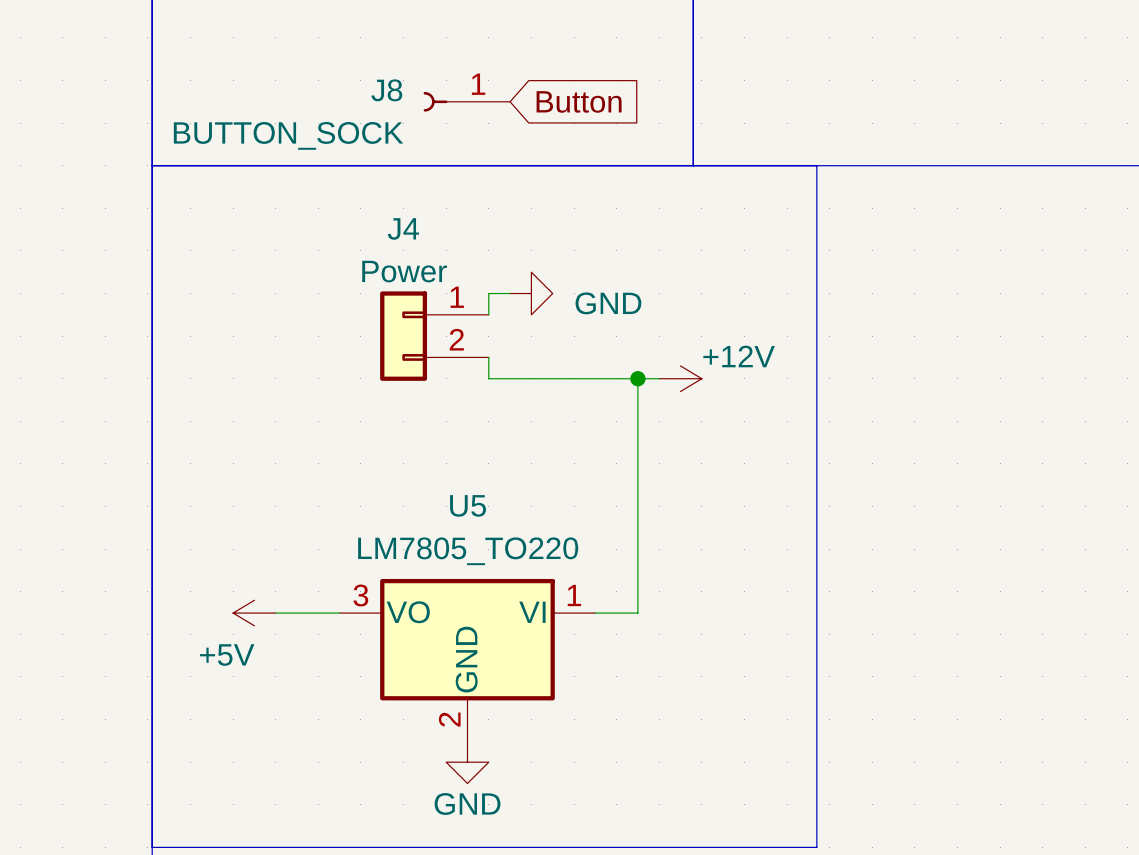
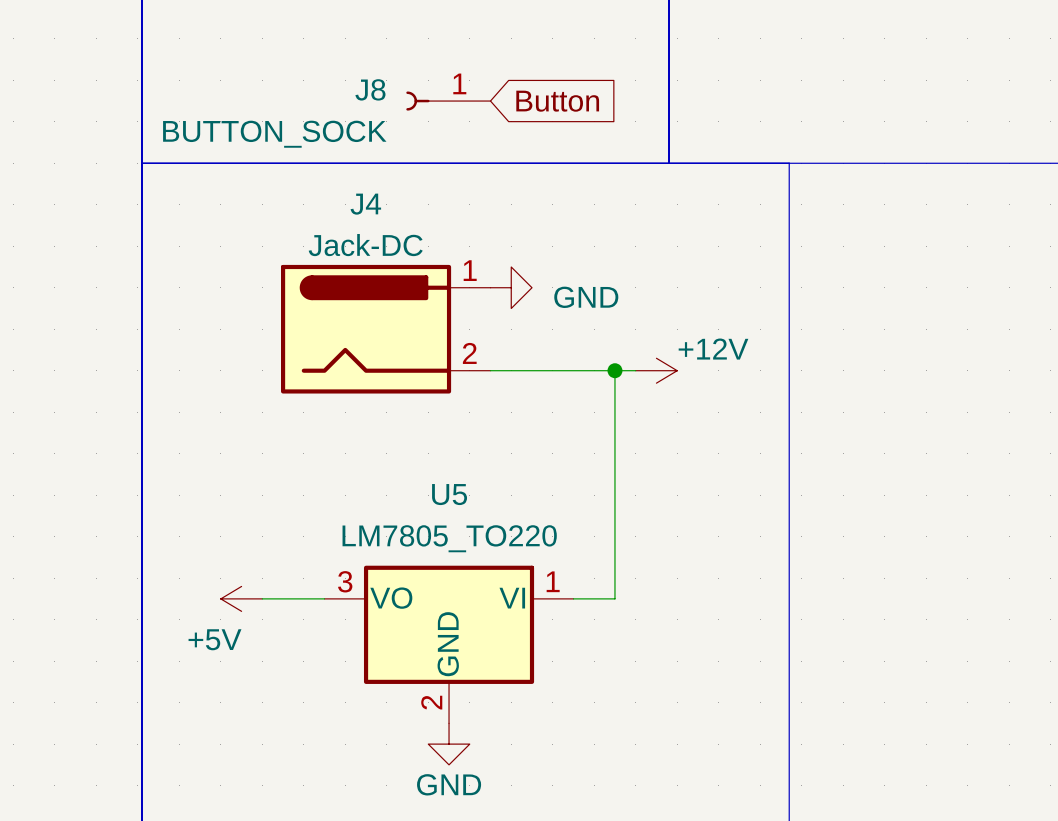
J4 value: Power (404, 271) -> Jack-DC (365, 245)
J4 symbol: [380, 291, 489, 381] -> [280, 264, 491, 394]
wire: (510, 293) (488, 293) (488, 314) -> none

